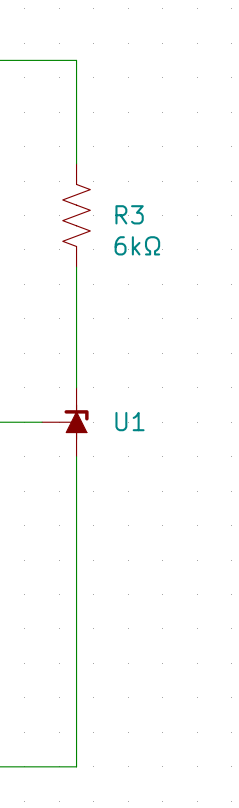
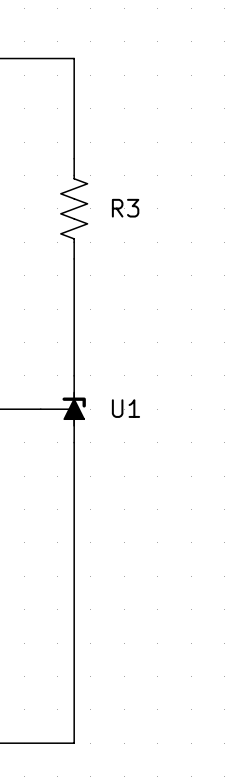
R3 value: 6kΩ (137, 245) -> none

